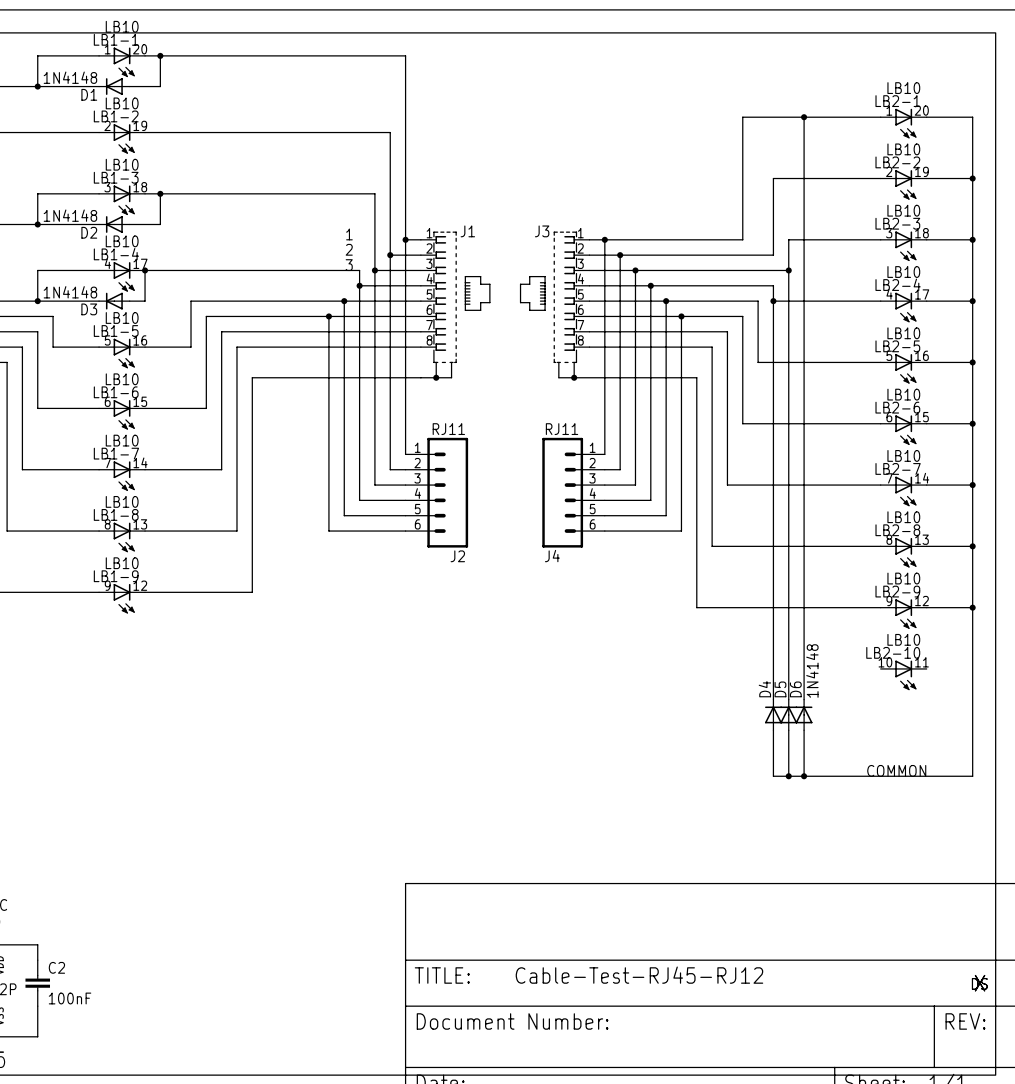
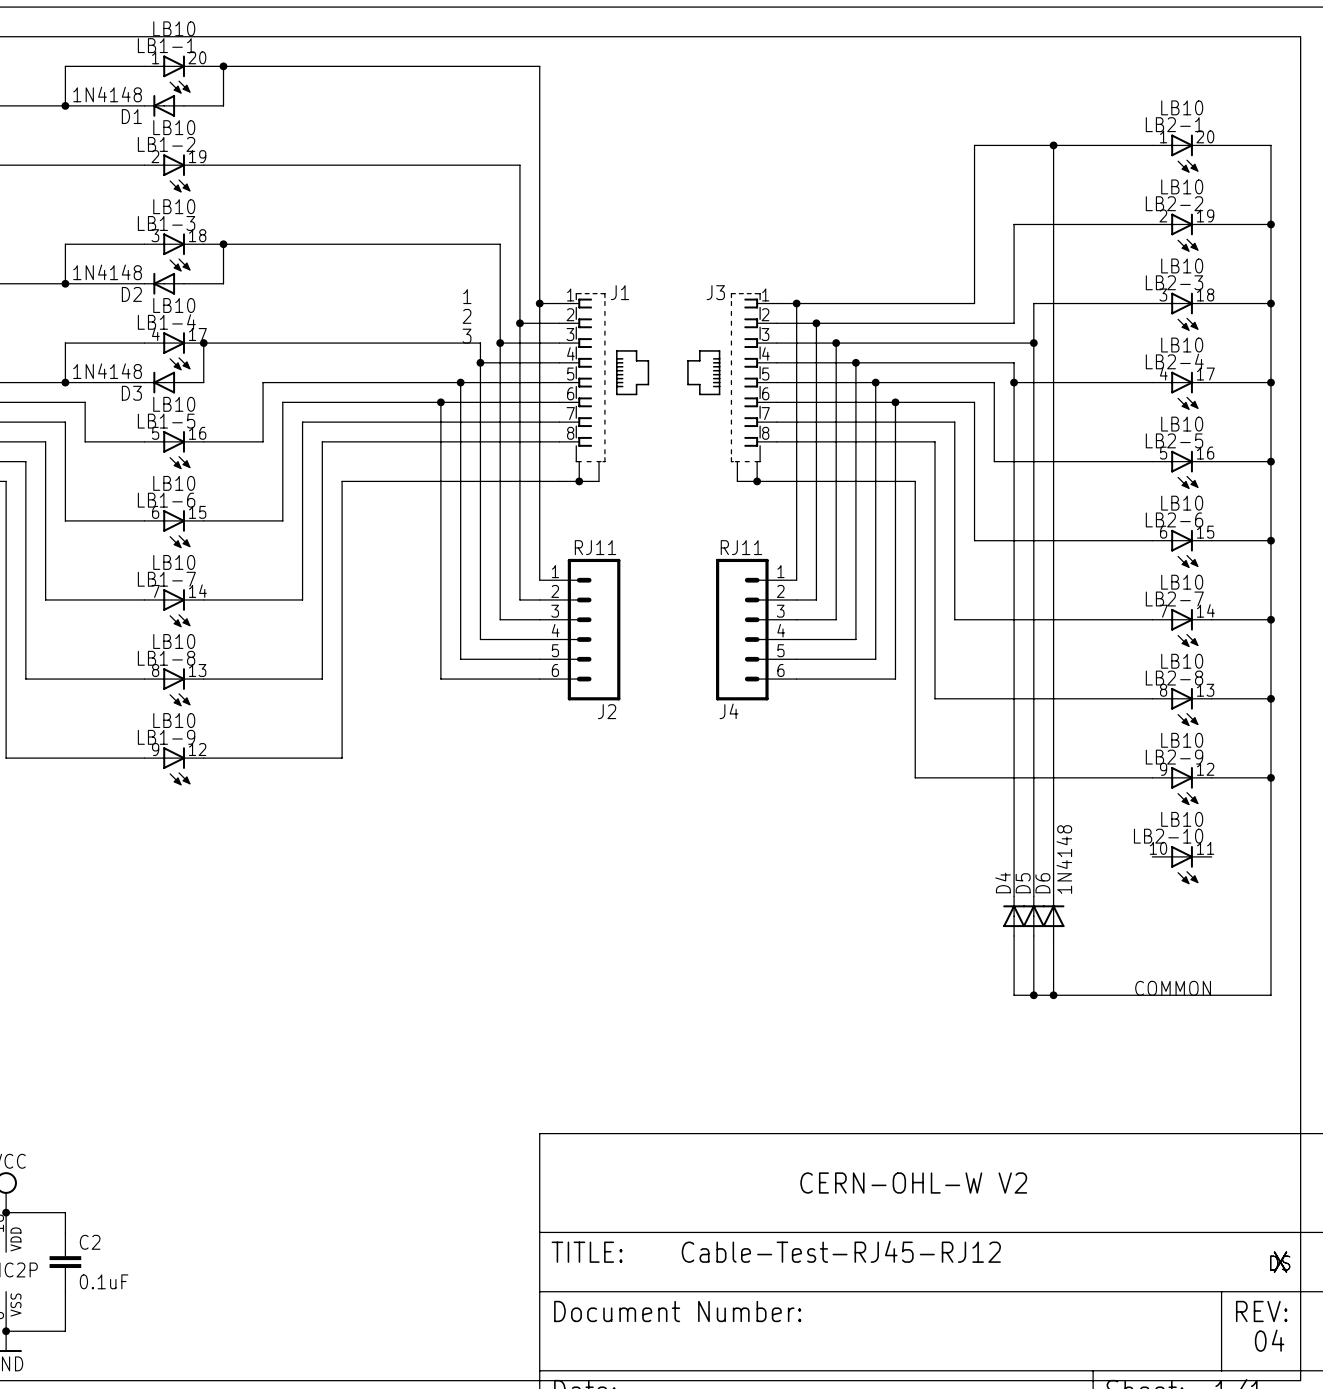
text: none -> CERN-OHL-W V2 (913, 1183)
C2 value: 100nF (70, 998) -> 0.1uF (104, 1281)
text: none -> 04 (1269, 1340)

